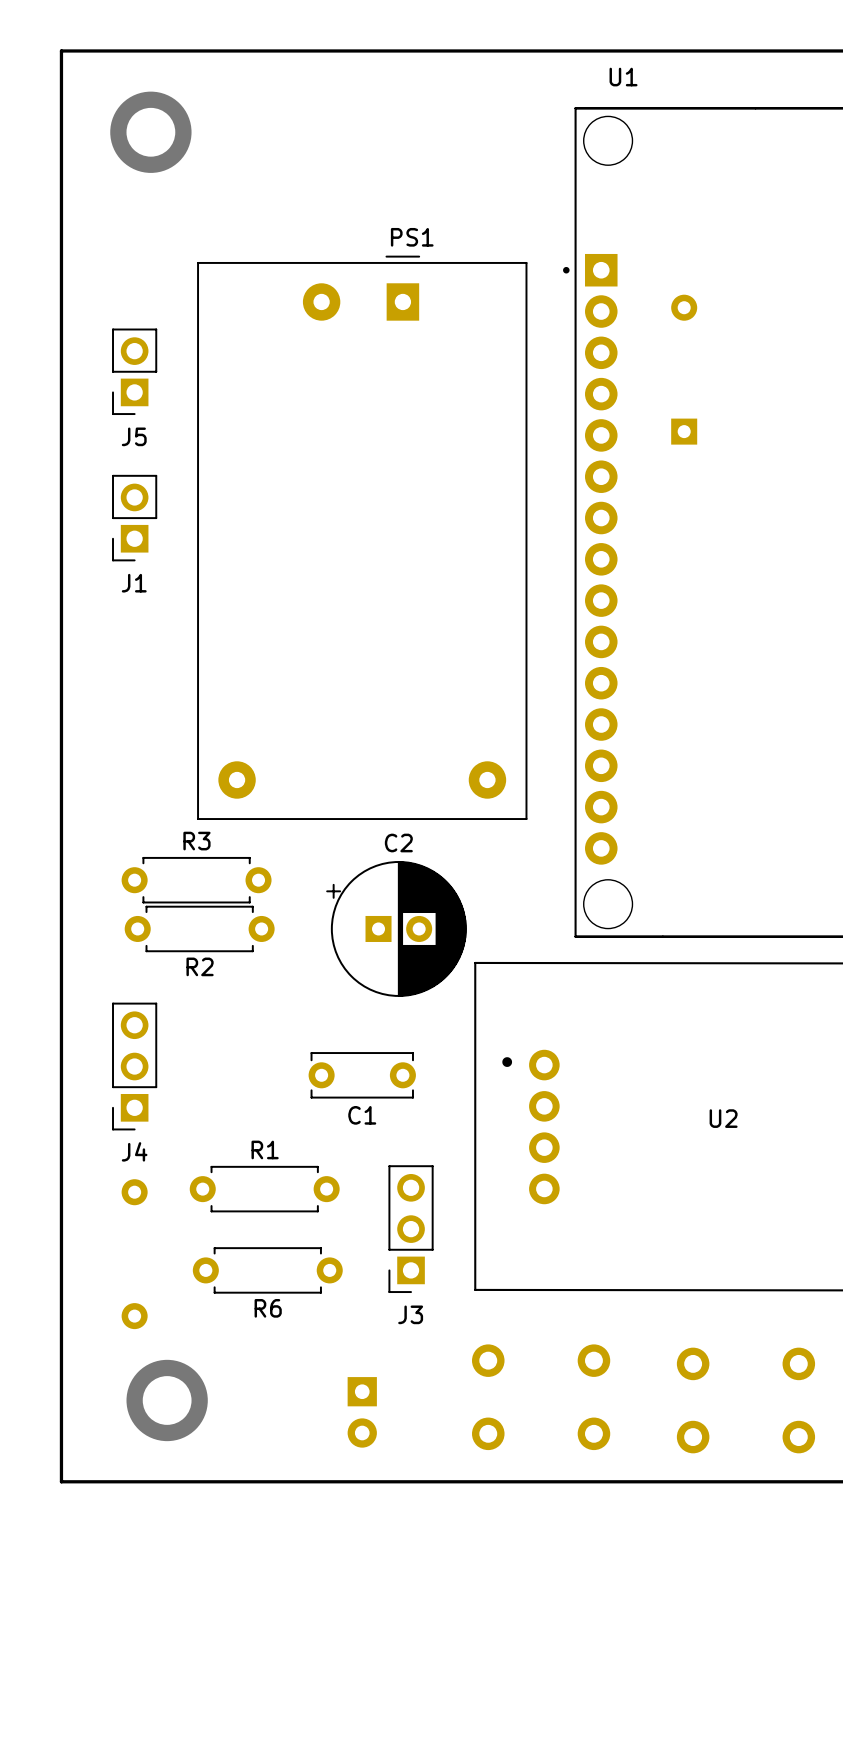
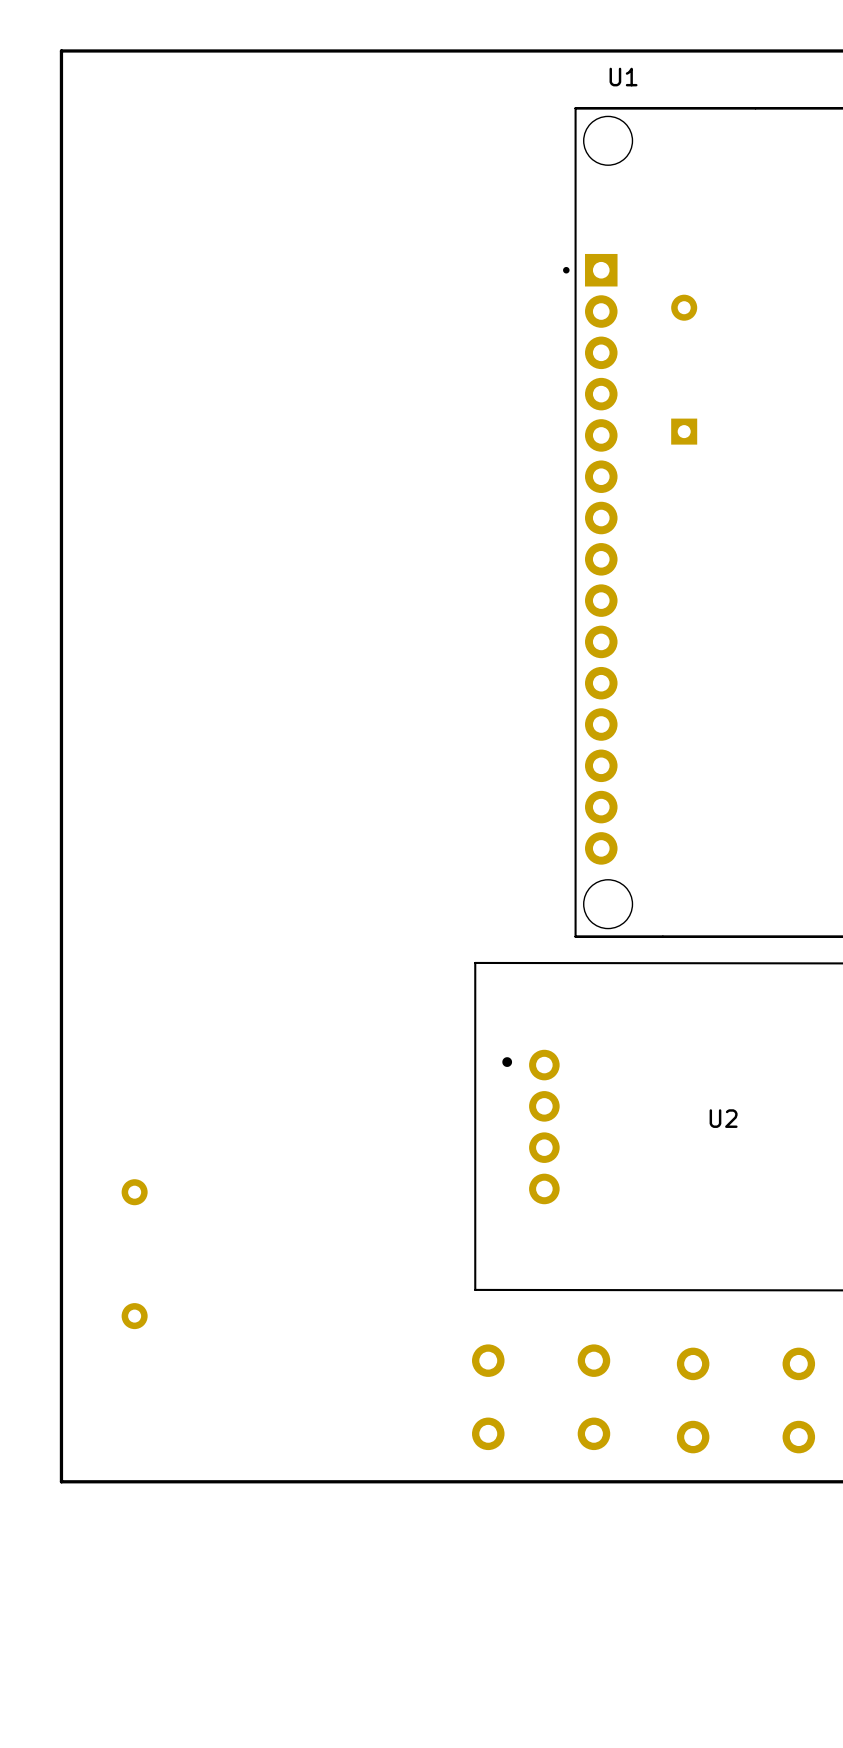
via: (150, 132) -> none
J5: (134, 371) -> none
J1: (134, 518) -> none
PS1: (362, 537) -> none
R3: (196, 880) -> none
R2: (199, 928) -> none
C2: (396, 928) -> none
J4: (134, 1066) -> none
C1: (362, 1075) -> none
R1: (264, 1189) -> none
J3: (411, 1229) -> none
R6: (267, 1270) -> none
via: (167, 1400) -> none
part: (362, 1412) -> none

